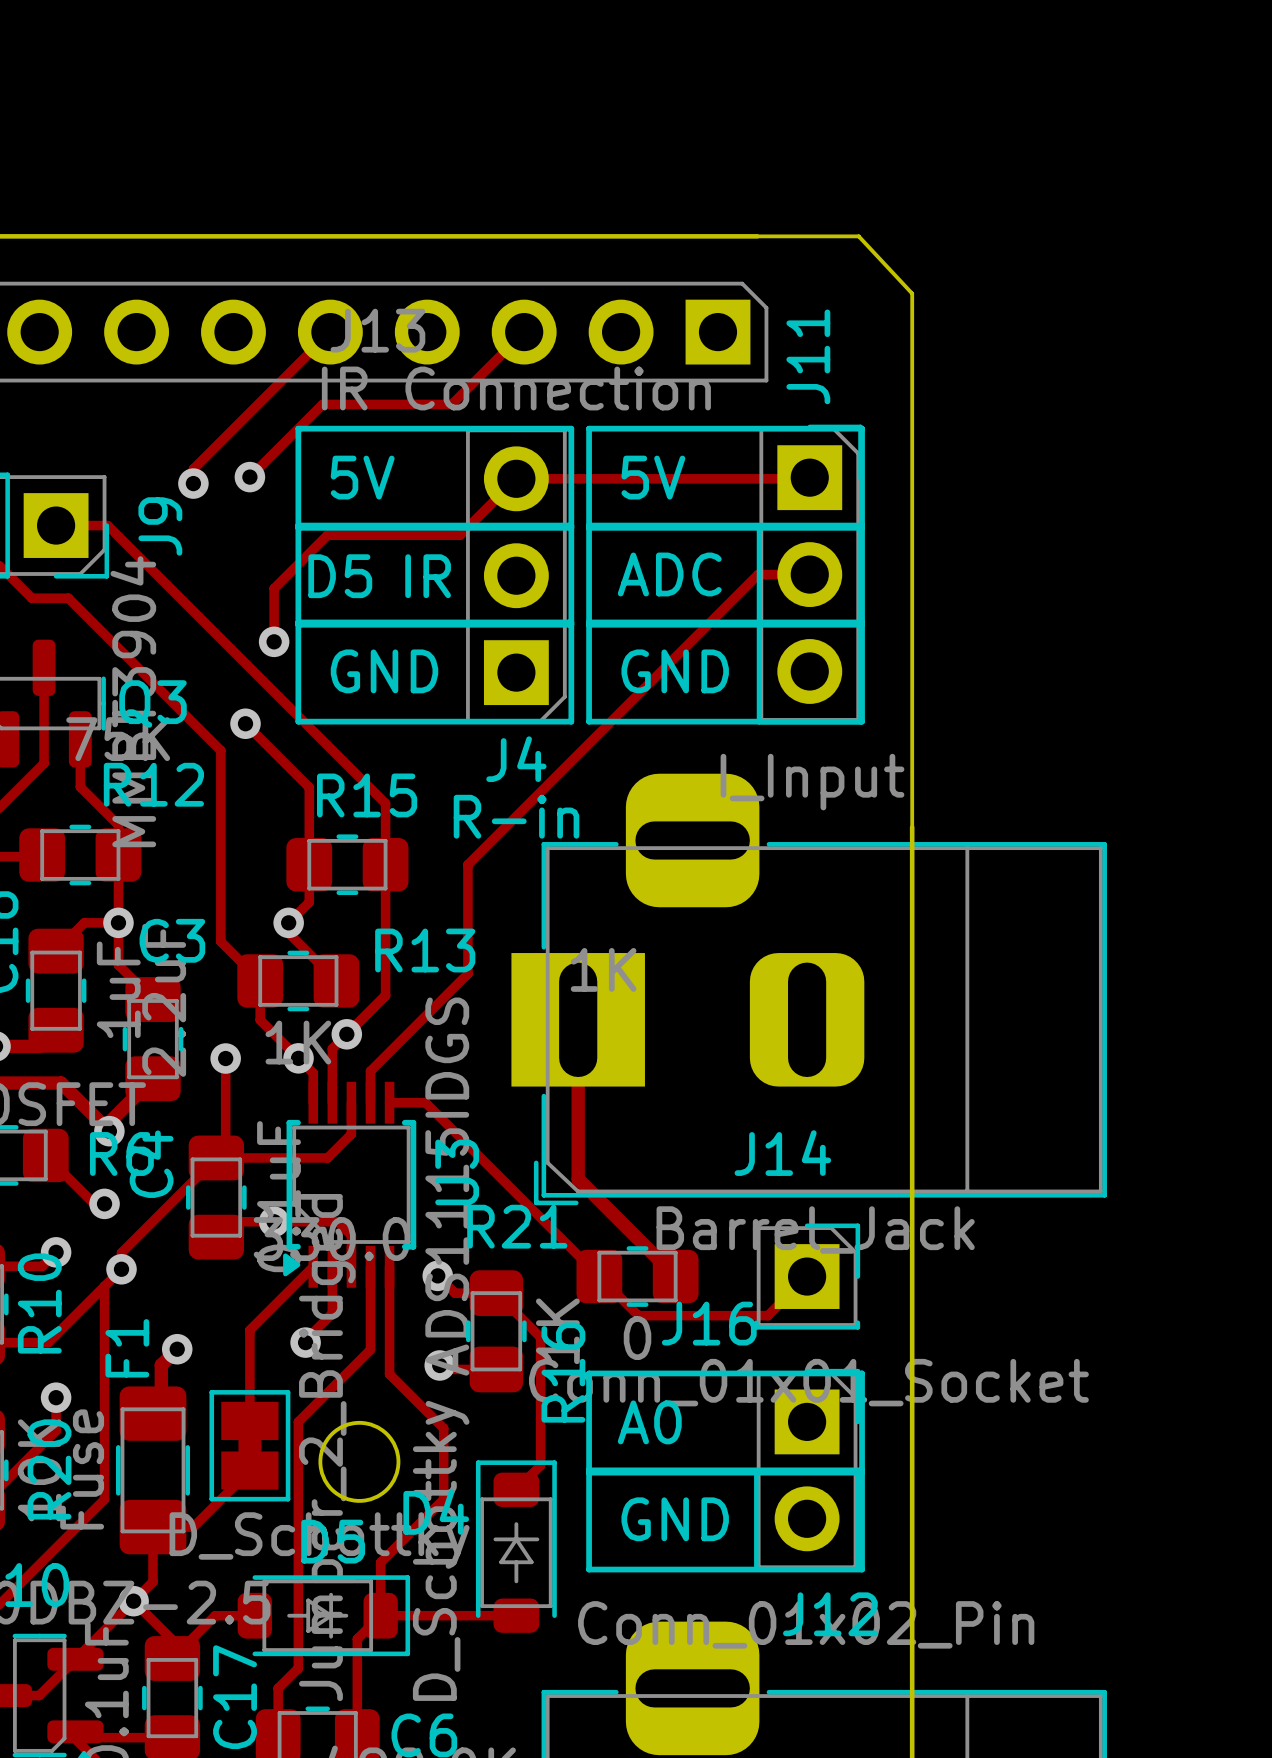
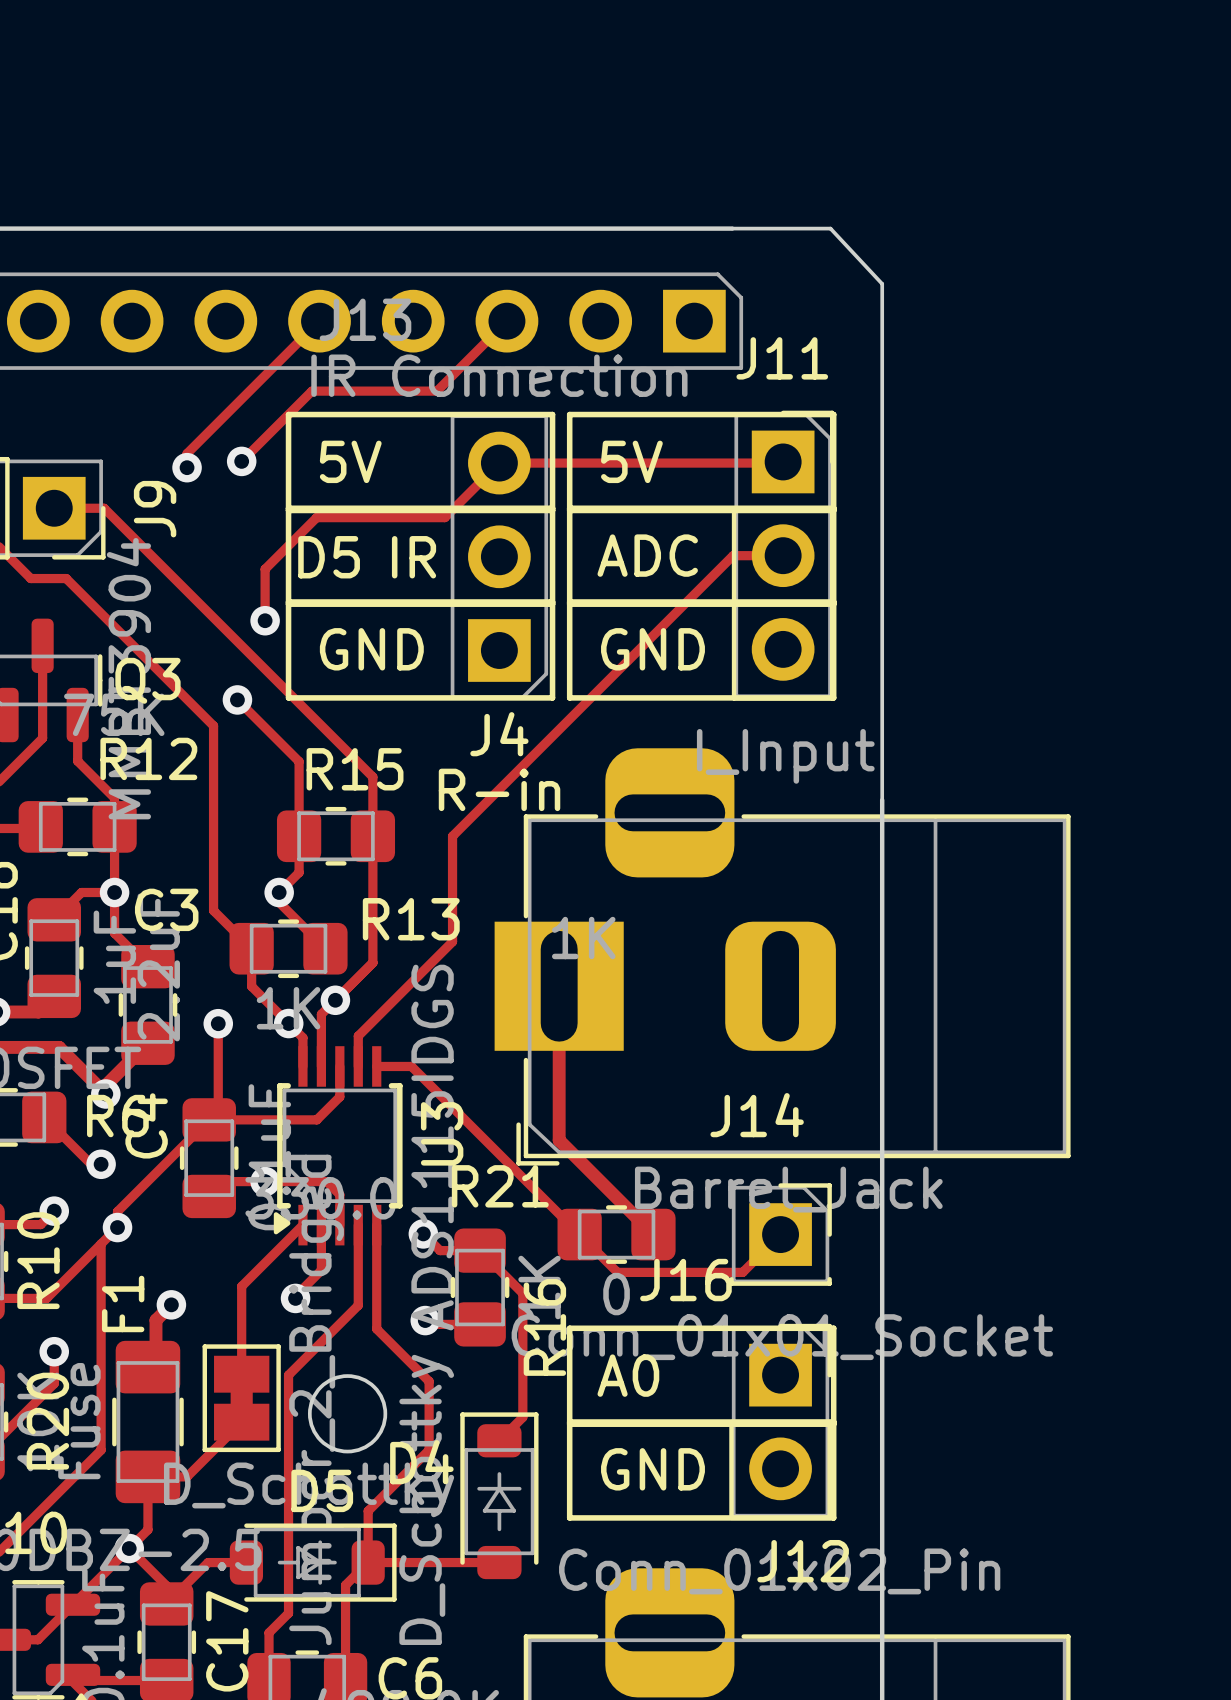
J11 name rotation: 0° (808, 356) -> 90° clockwise (782, 358)

